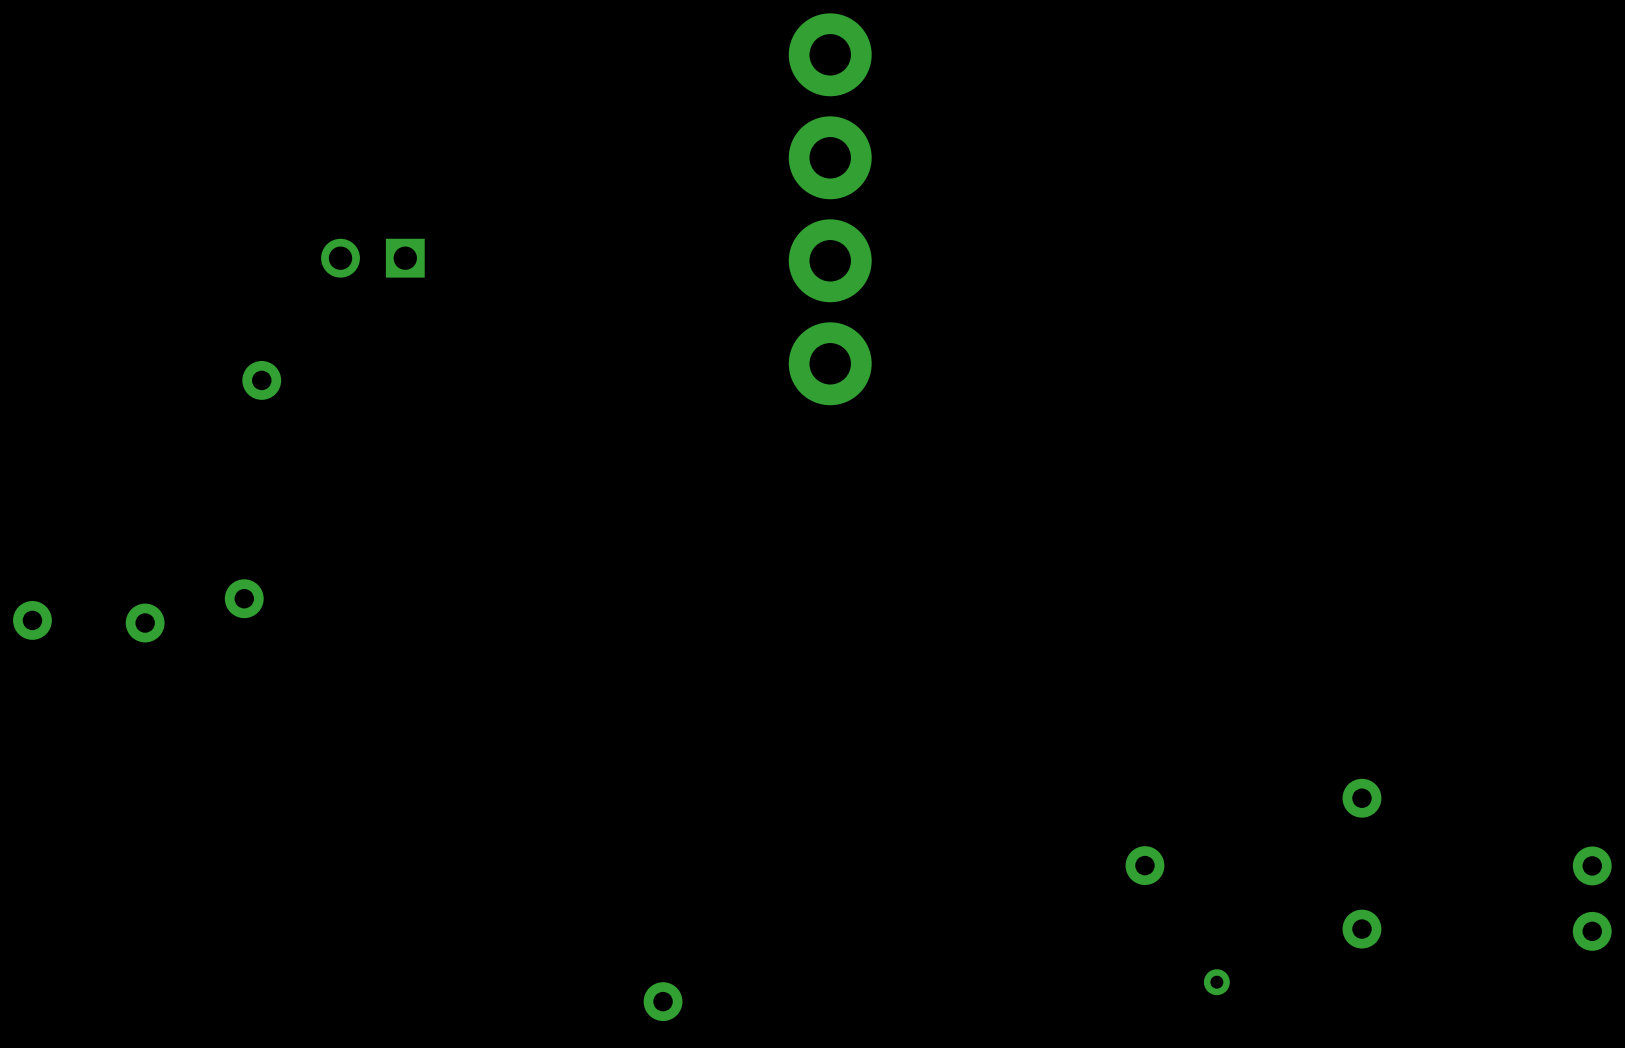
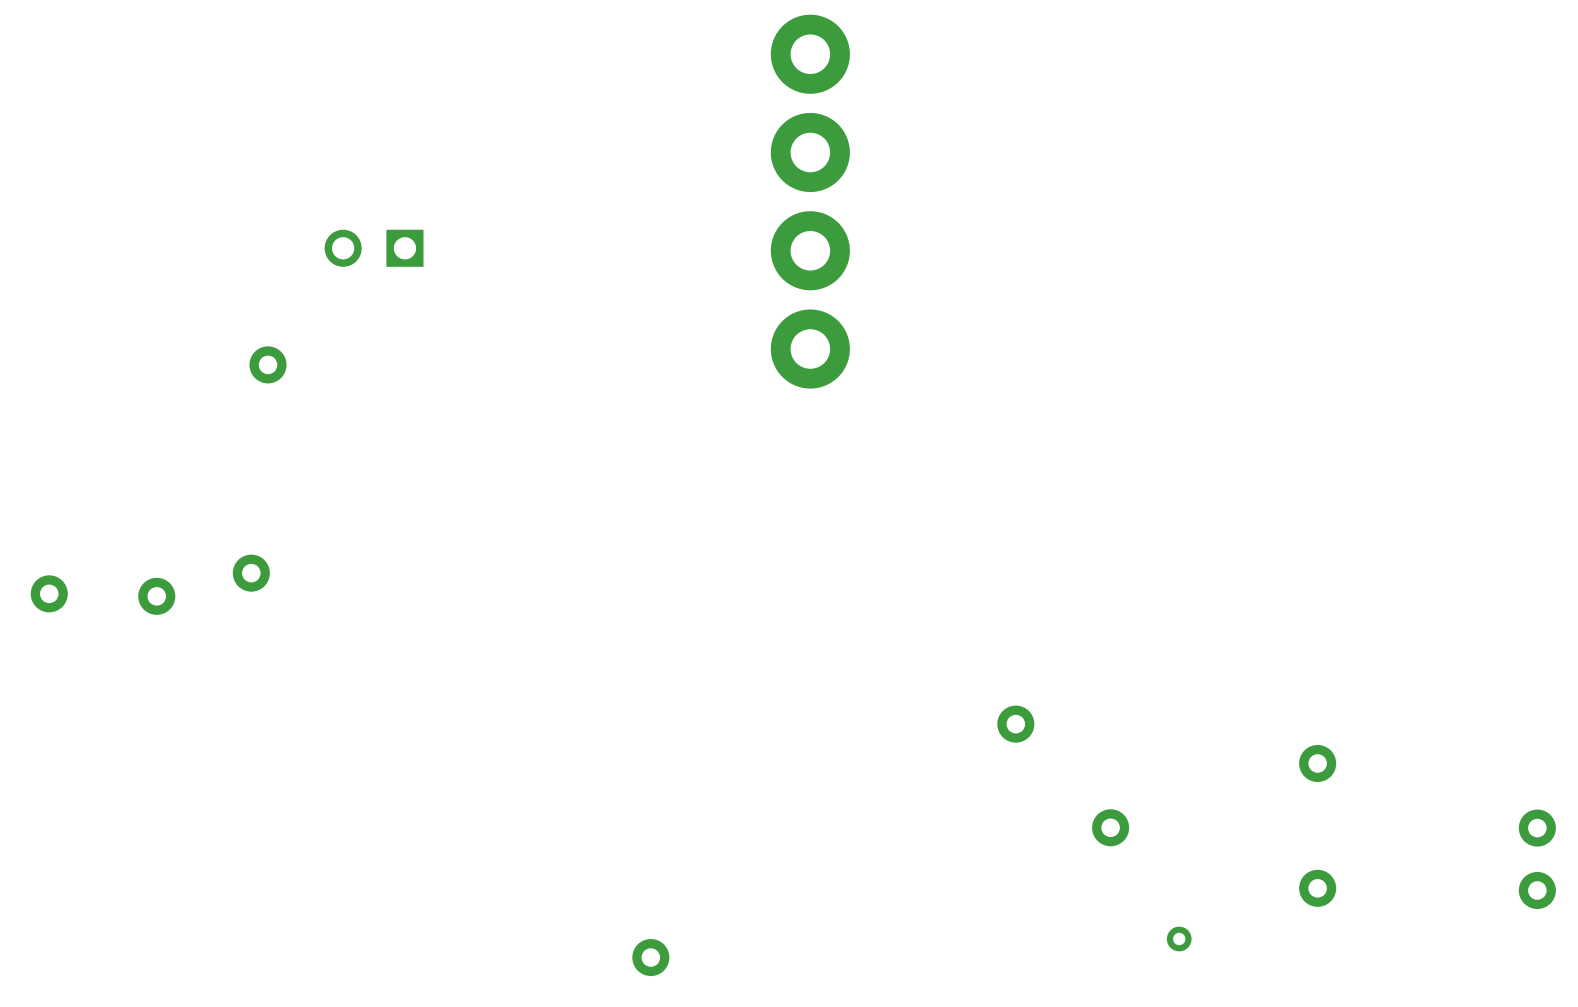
part: none -> (1015, 724)

